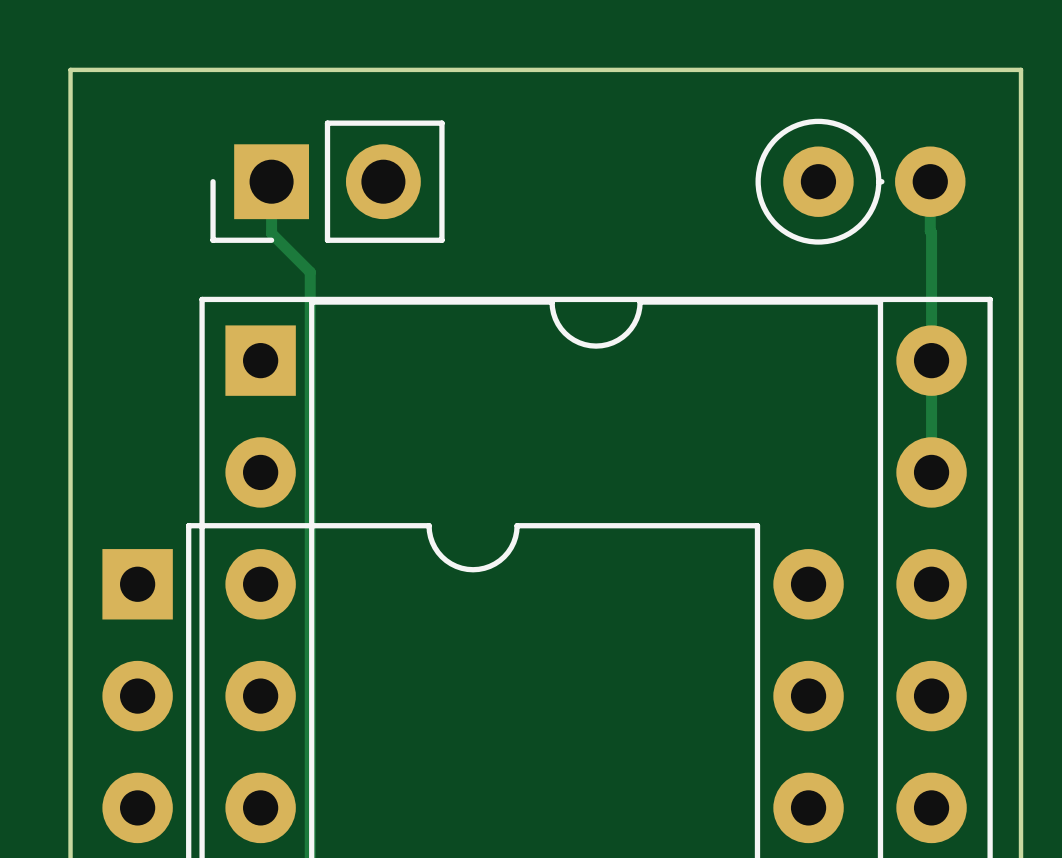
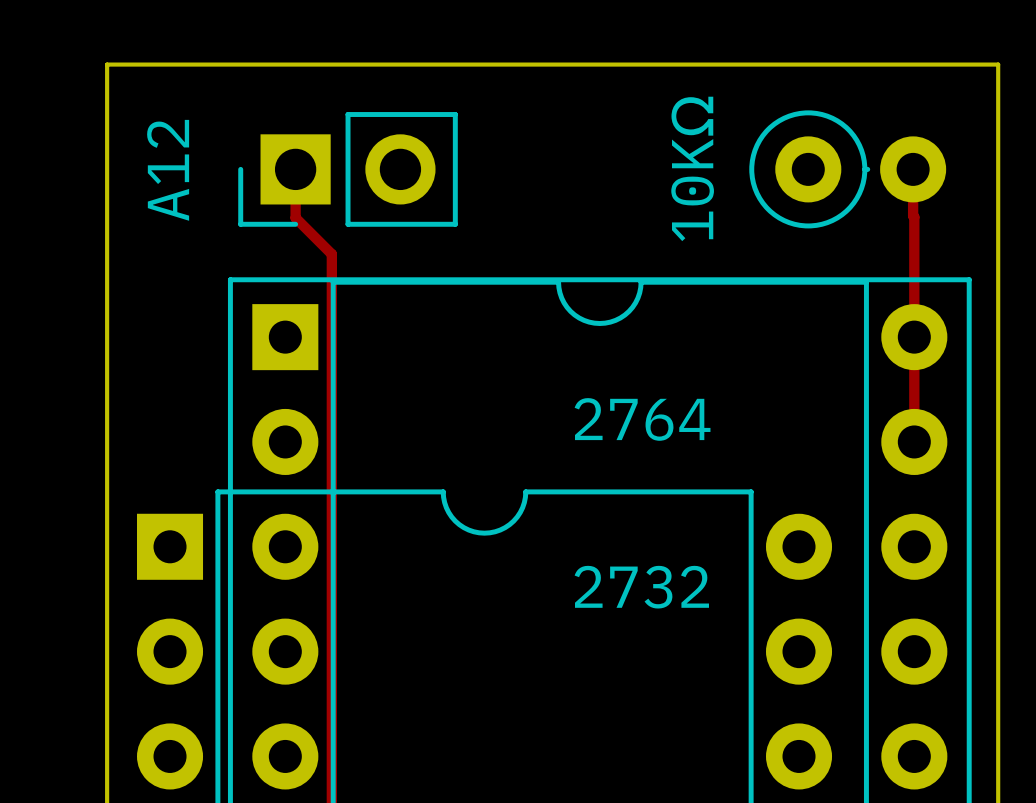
part value: none -> 10KΩ (692, 168)
part value: none -> A12 (168, 170)
part value: none -> 2764 (642, 419)
part value: none -> 2732 (641, 587)

